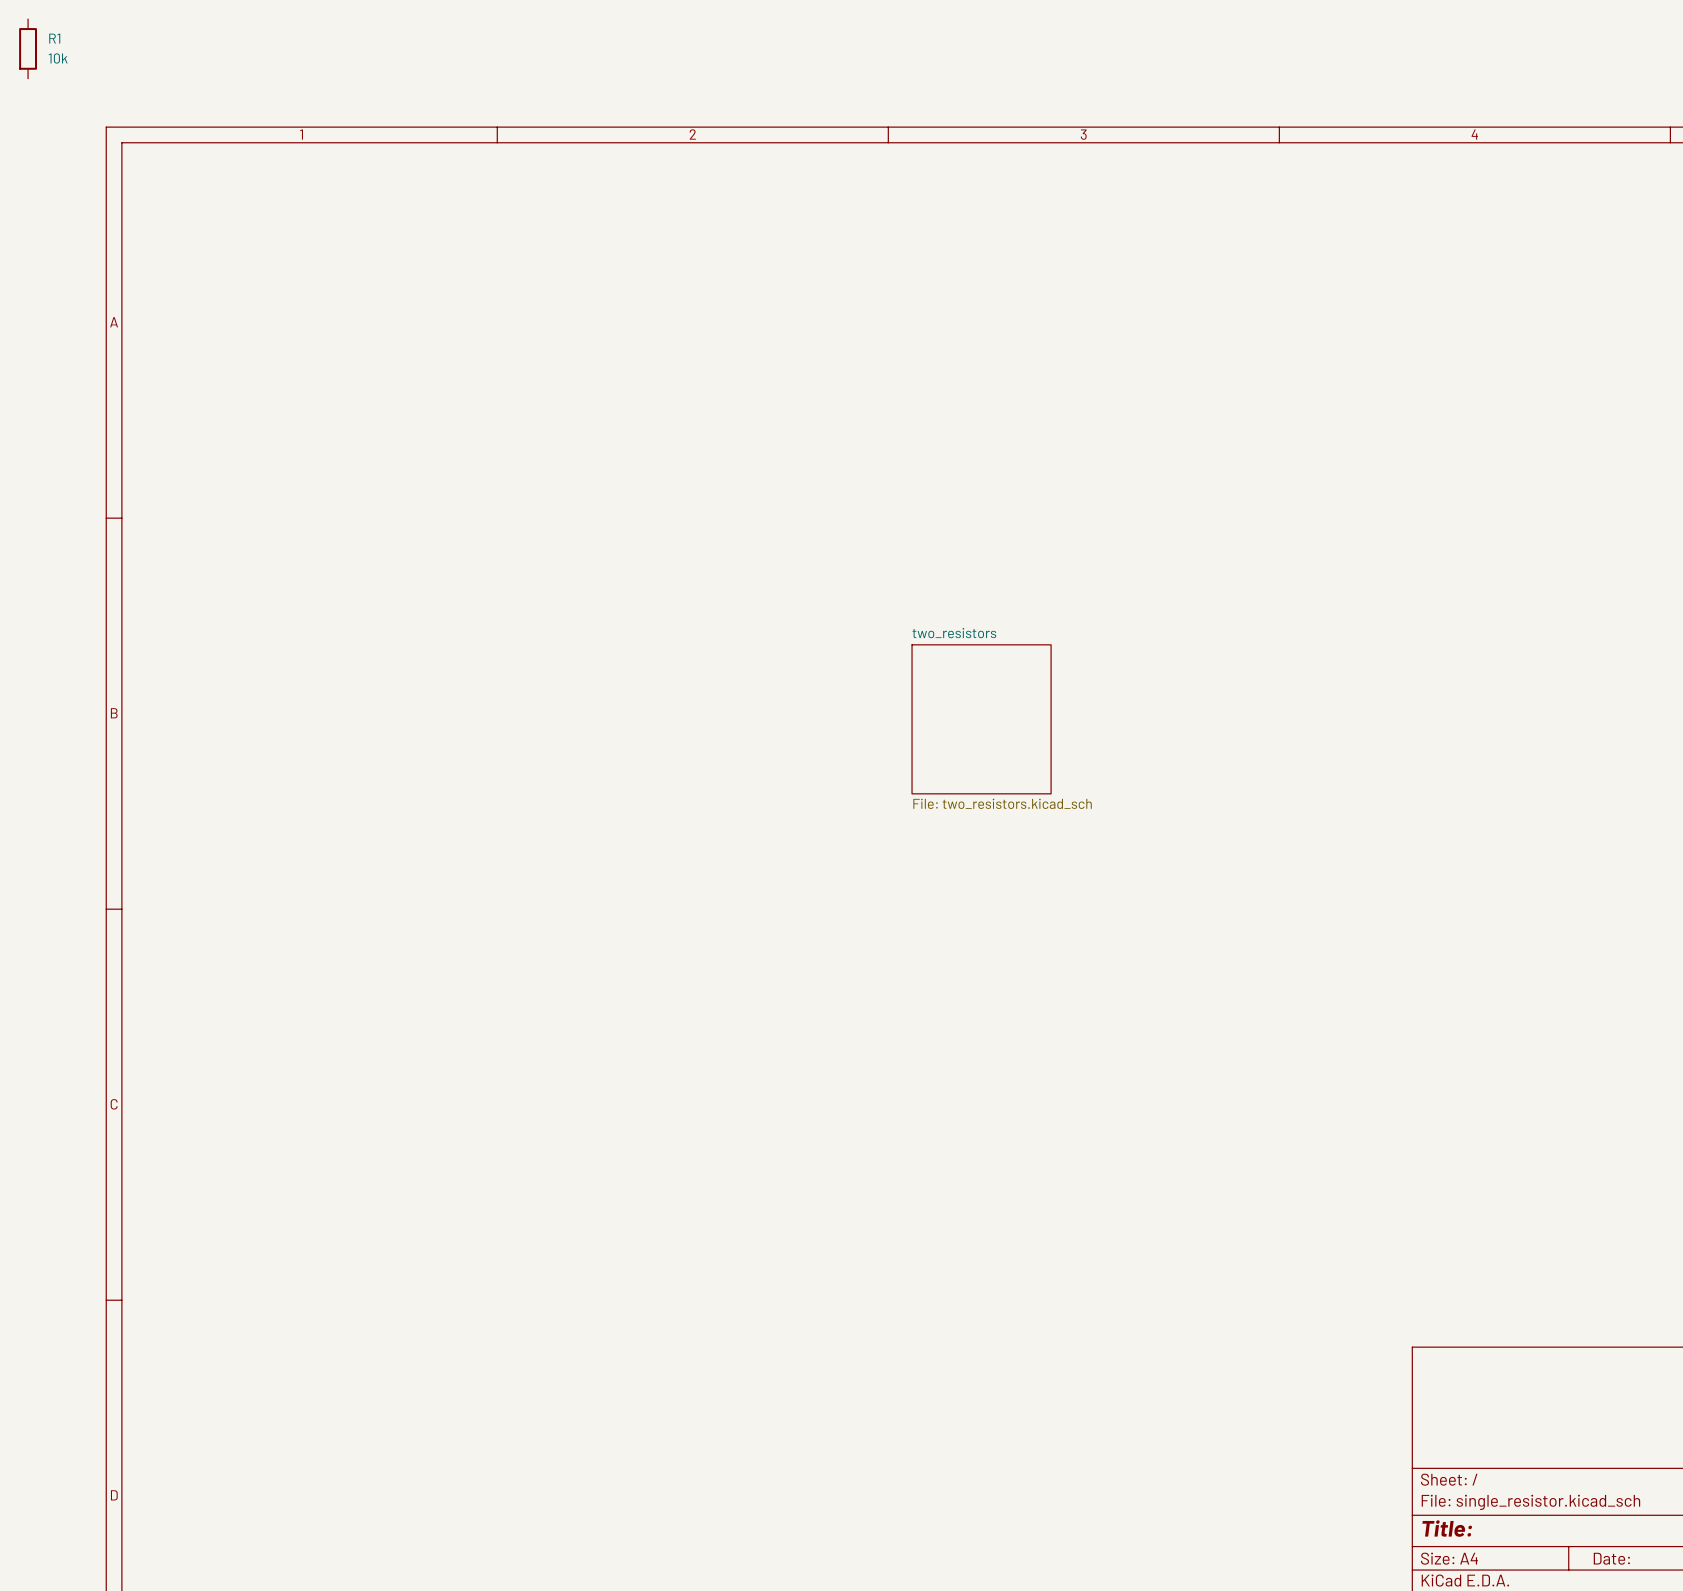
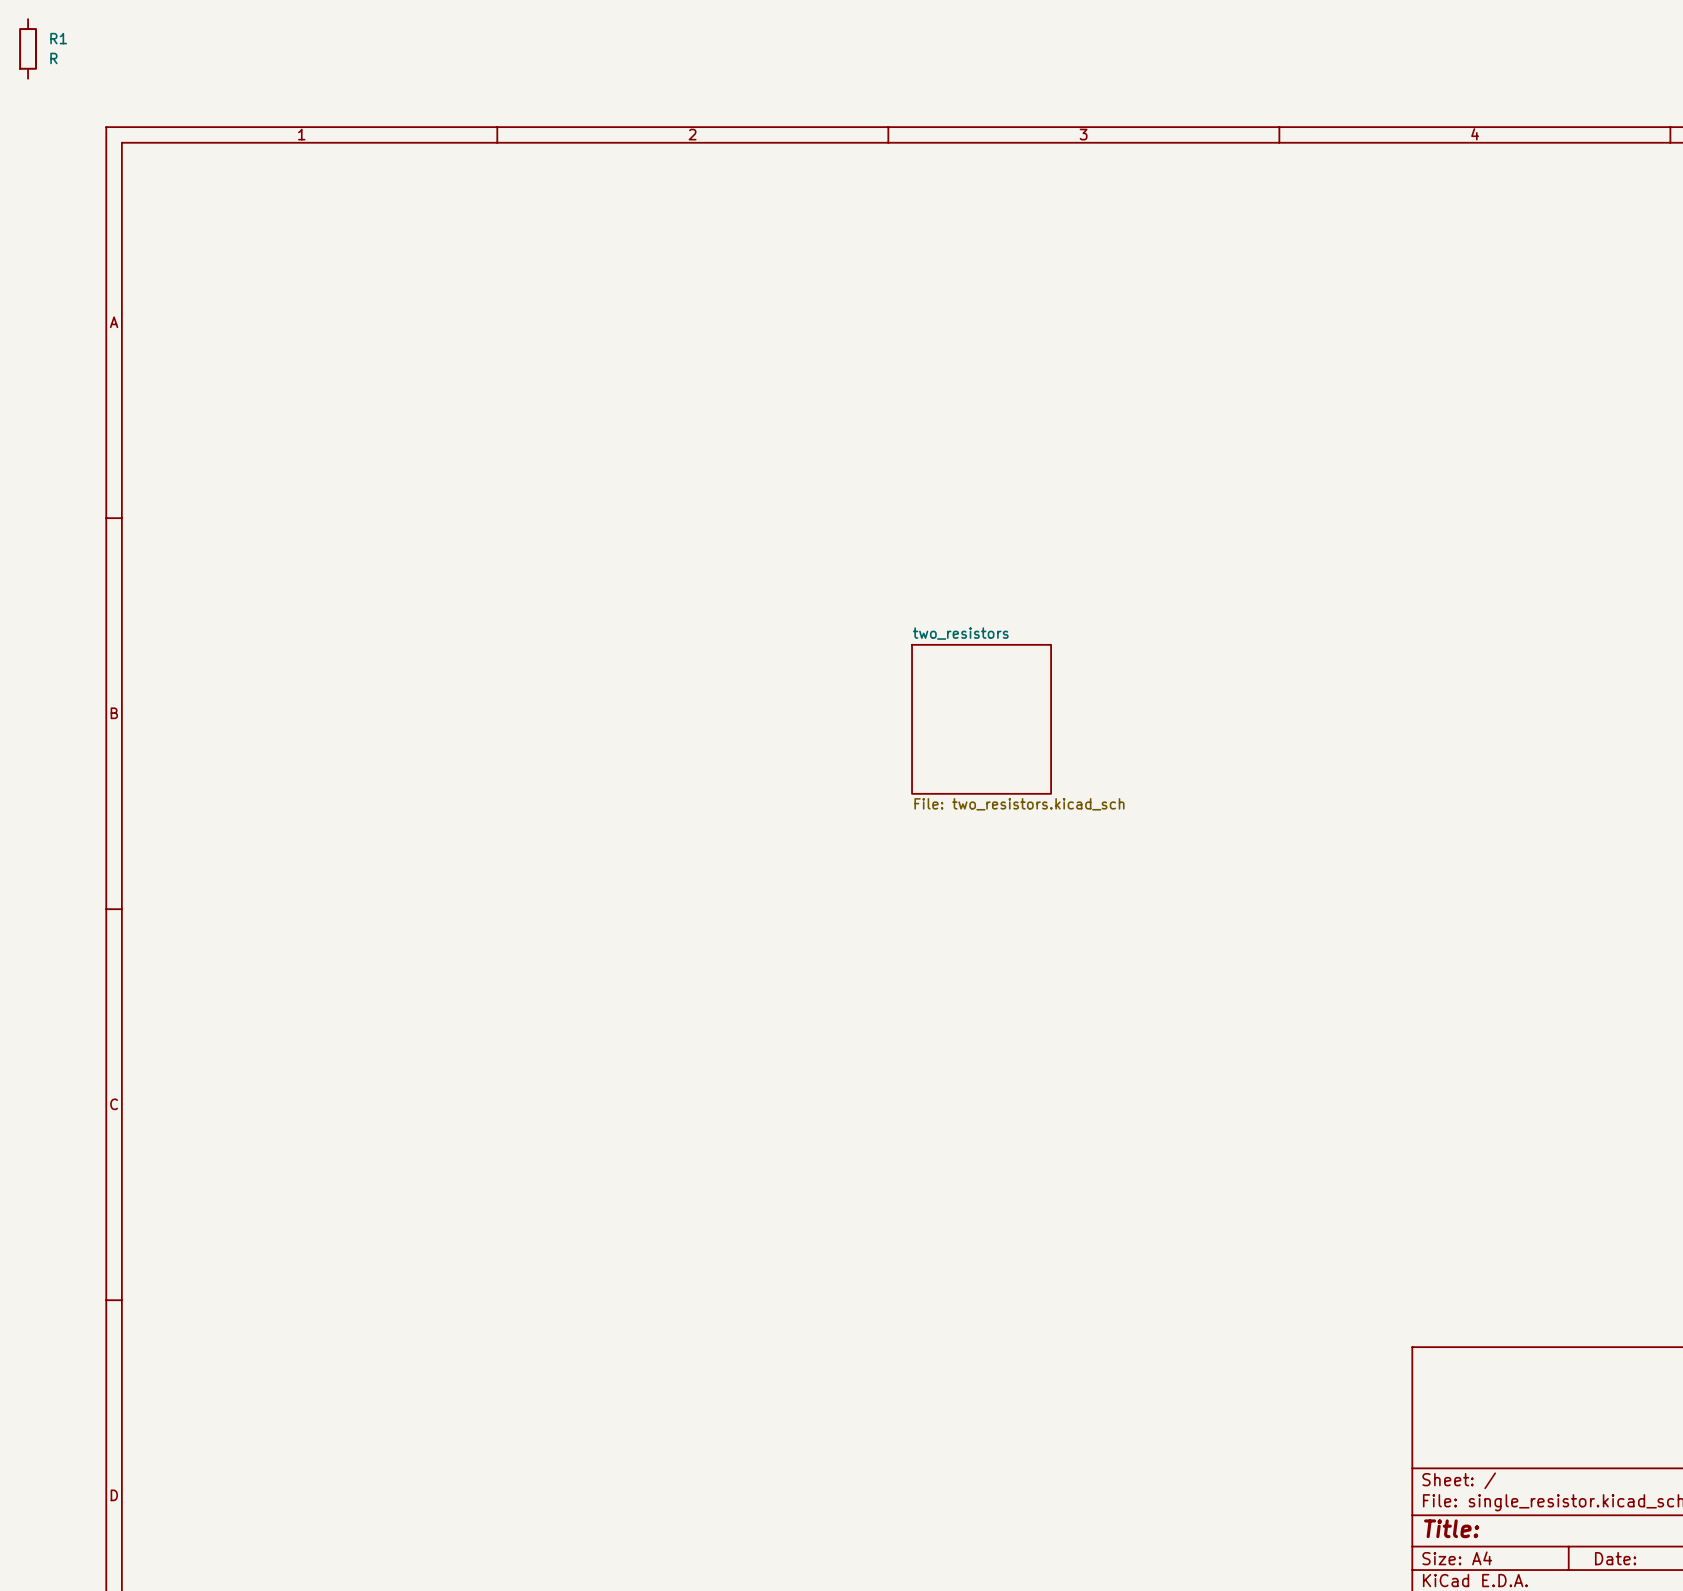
R1 value: 10k (58, 58) -> R (53, 58)

